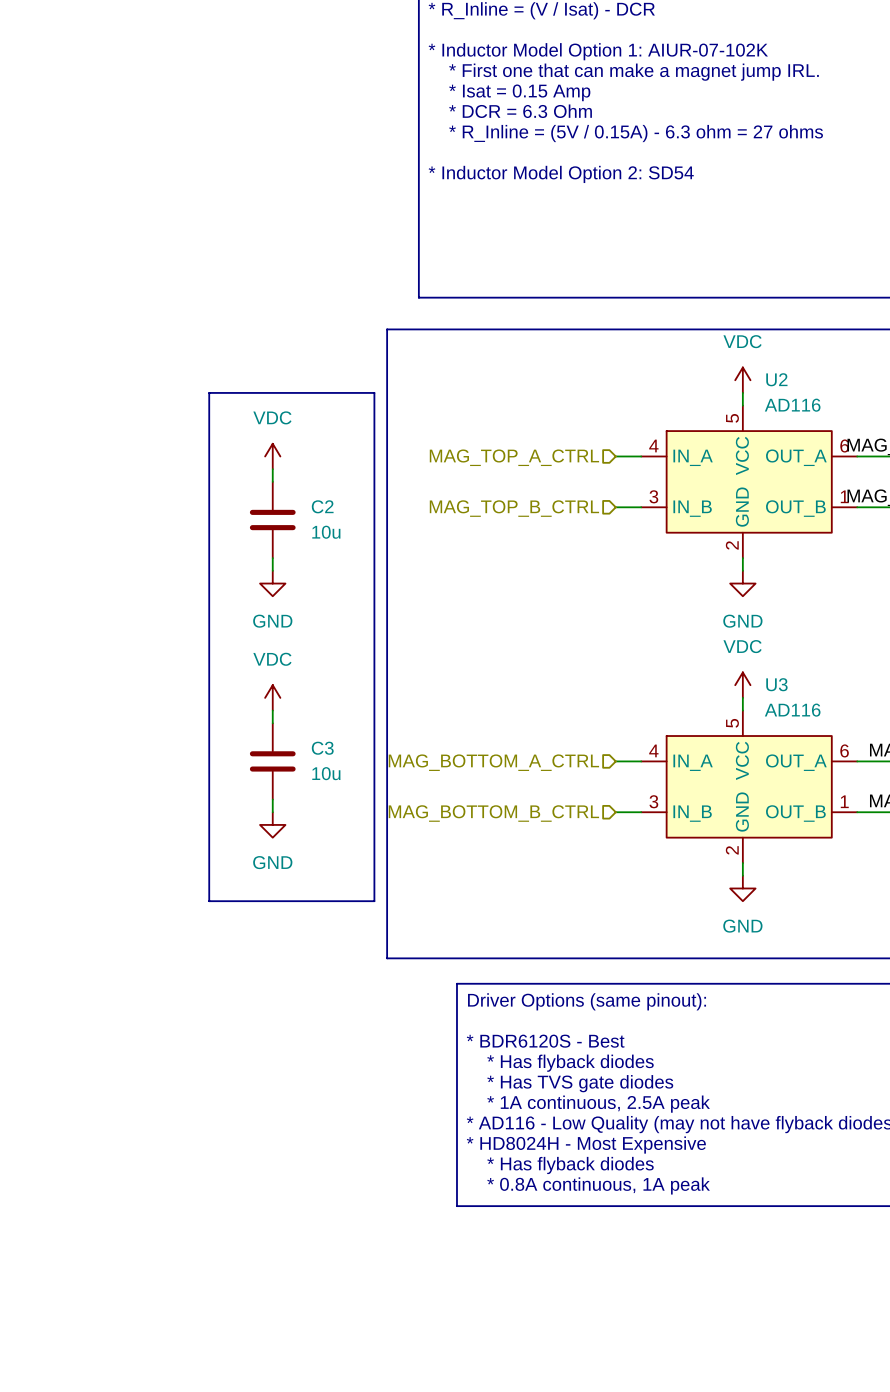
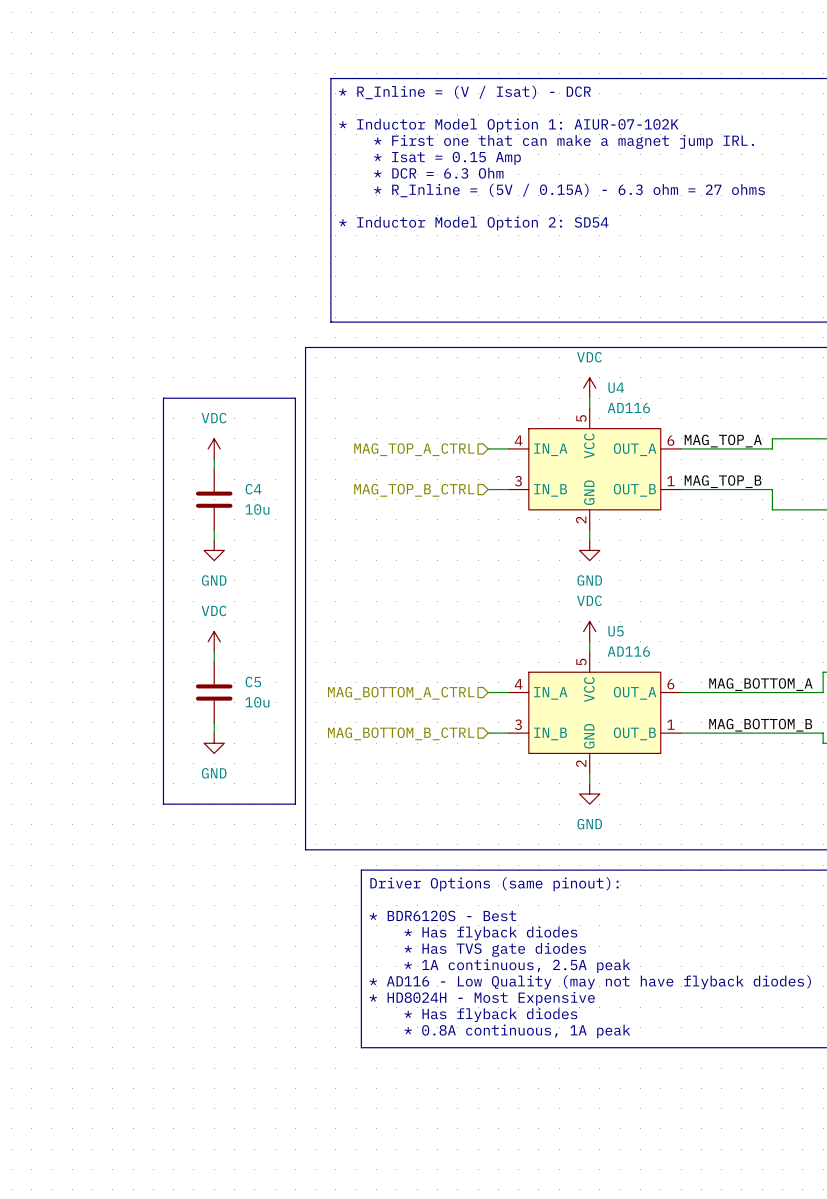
U2 name: U2 (776, 379) -> U4 (616, 387)
C2 name: C2 (322, 506) -> C4 (253, 489)
U3 name: U3 (776, 684) -> U5 (616, 631)
C3 name: C3 (322, 748) -> C5 (253, 681)

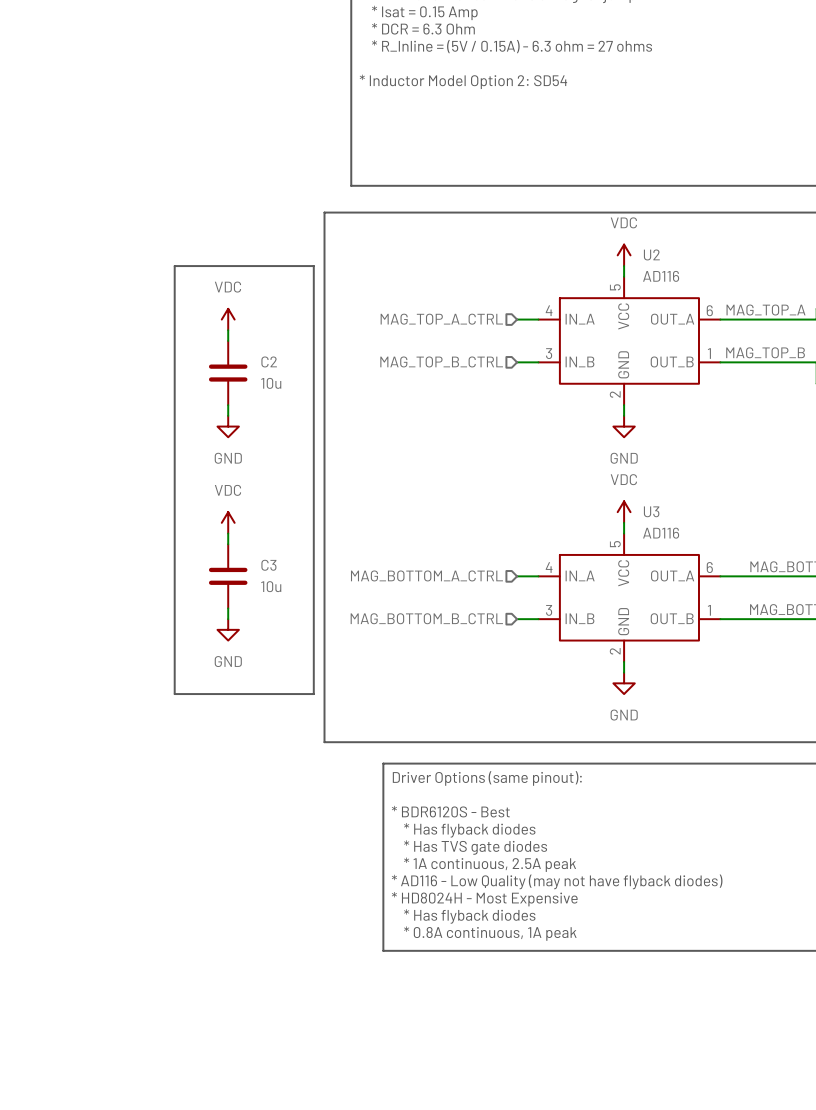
U4 name: U4 (616, 387) -> U2 (651, 254)
C4 name: C4 (253, 489) -> C2 (269, 361)
U5 name: U5 (616, 631) -> U3 (651, 511)
C5 name: C5 (253, 681) -> C3 (268, 565)

